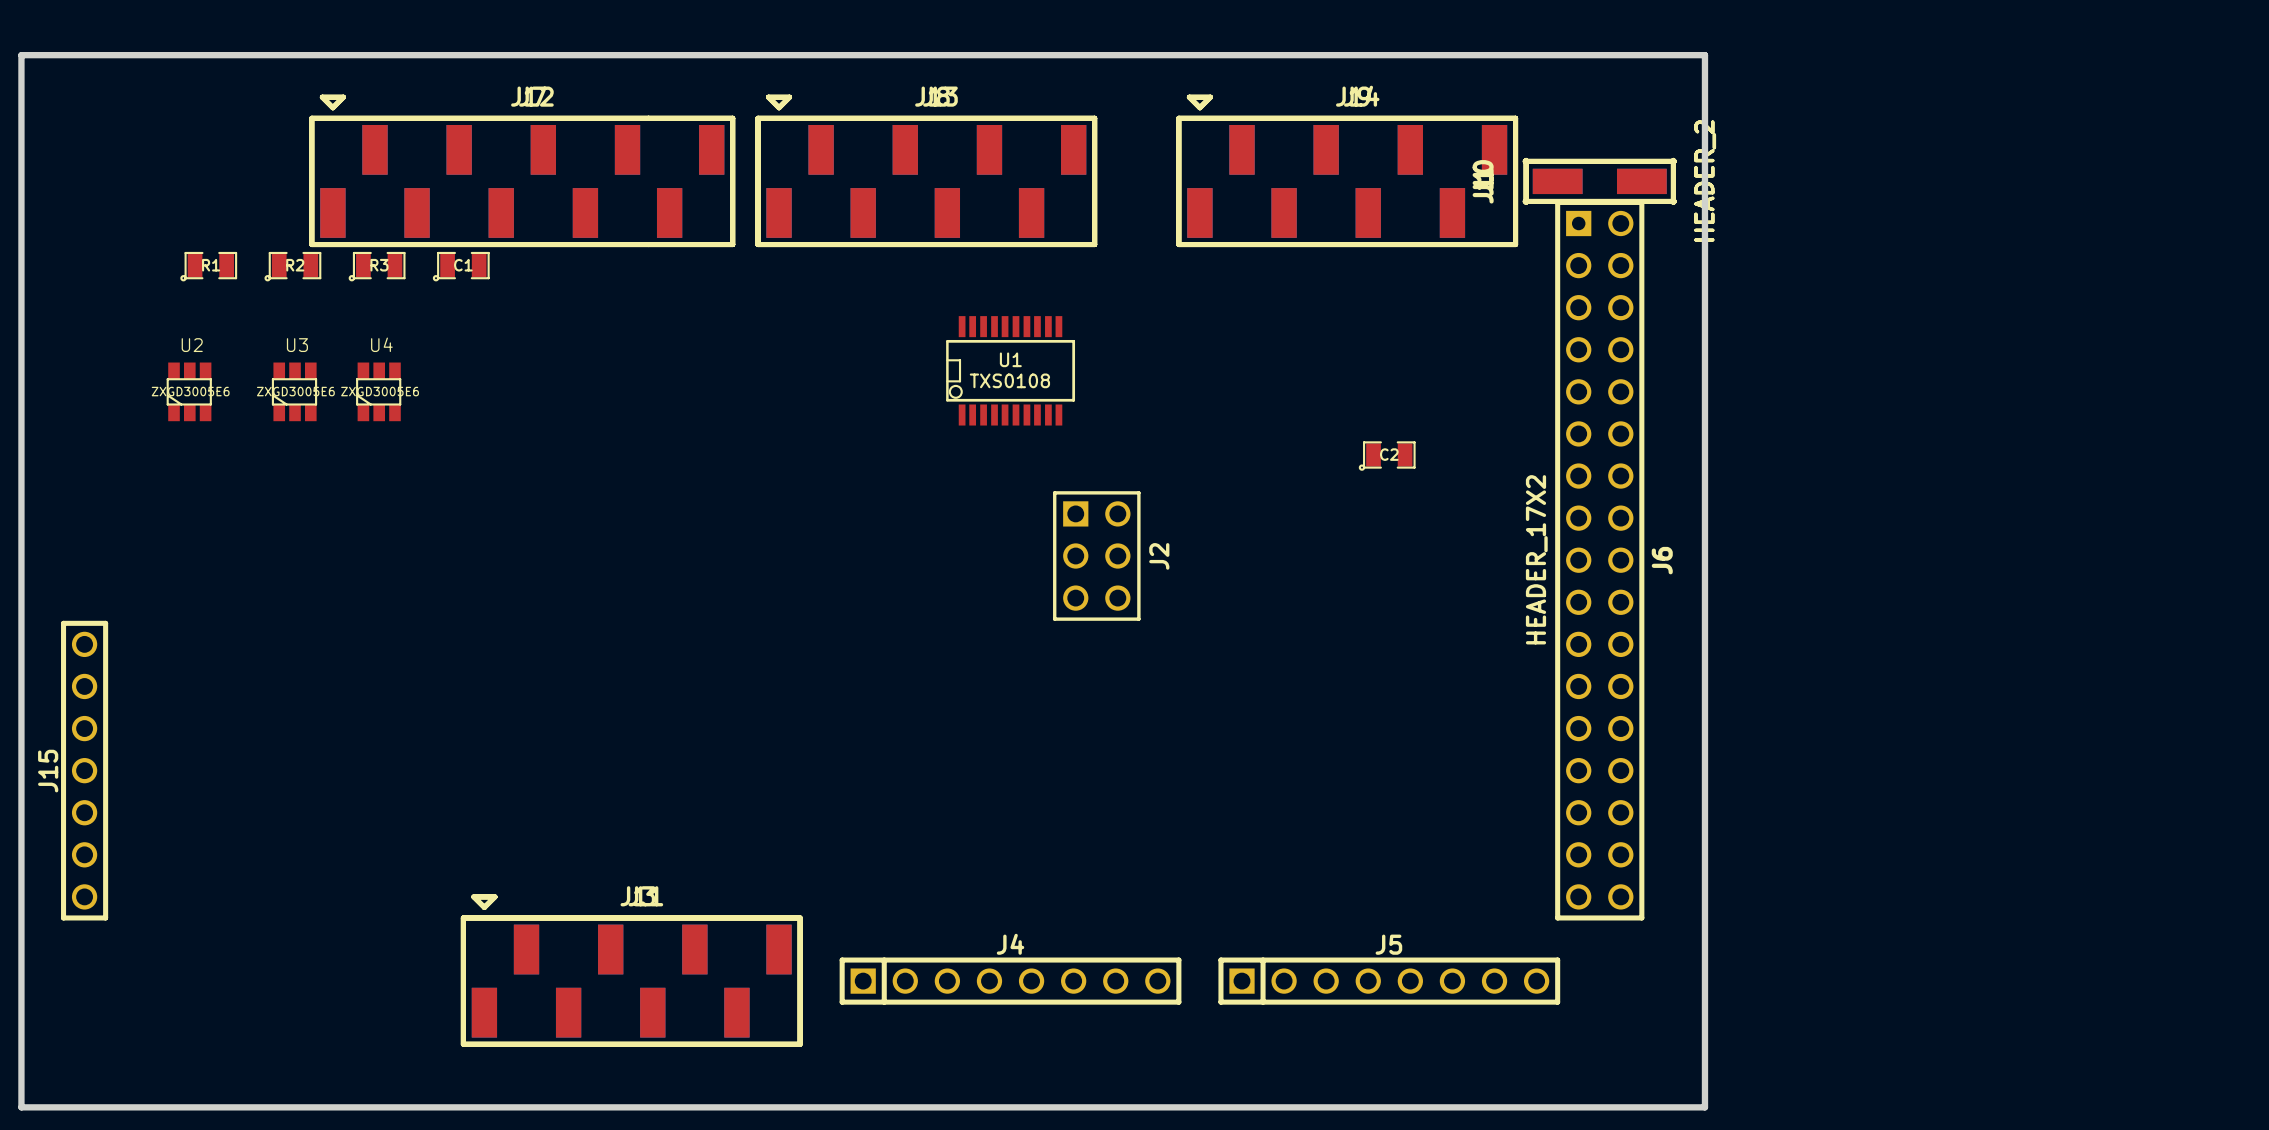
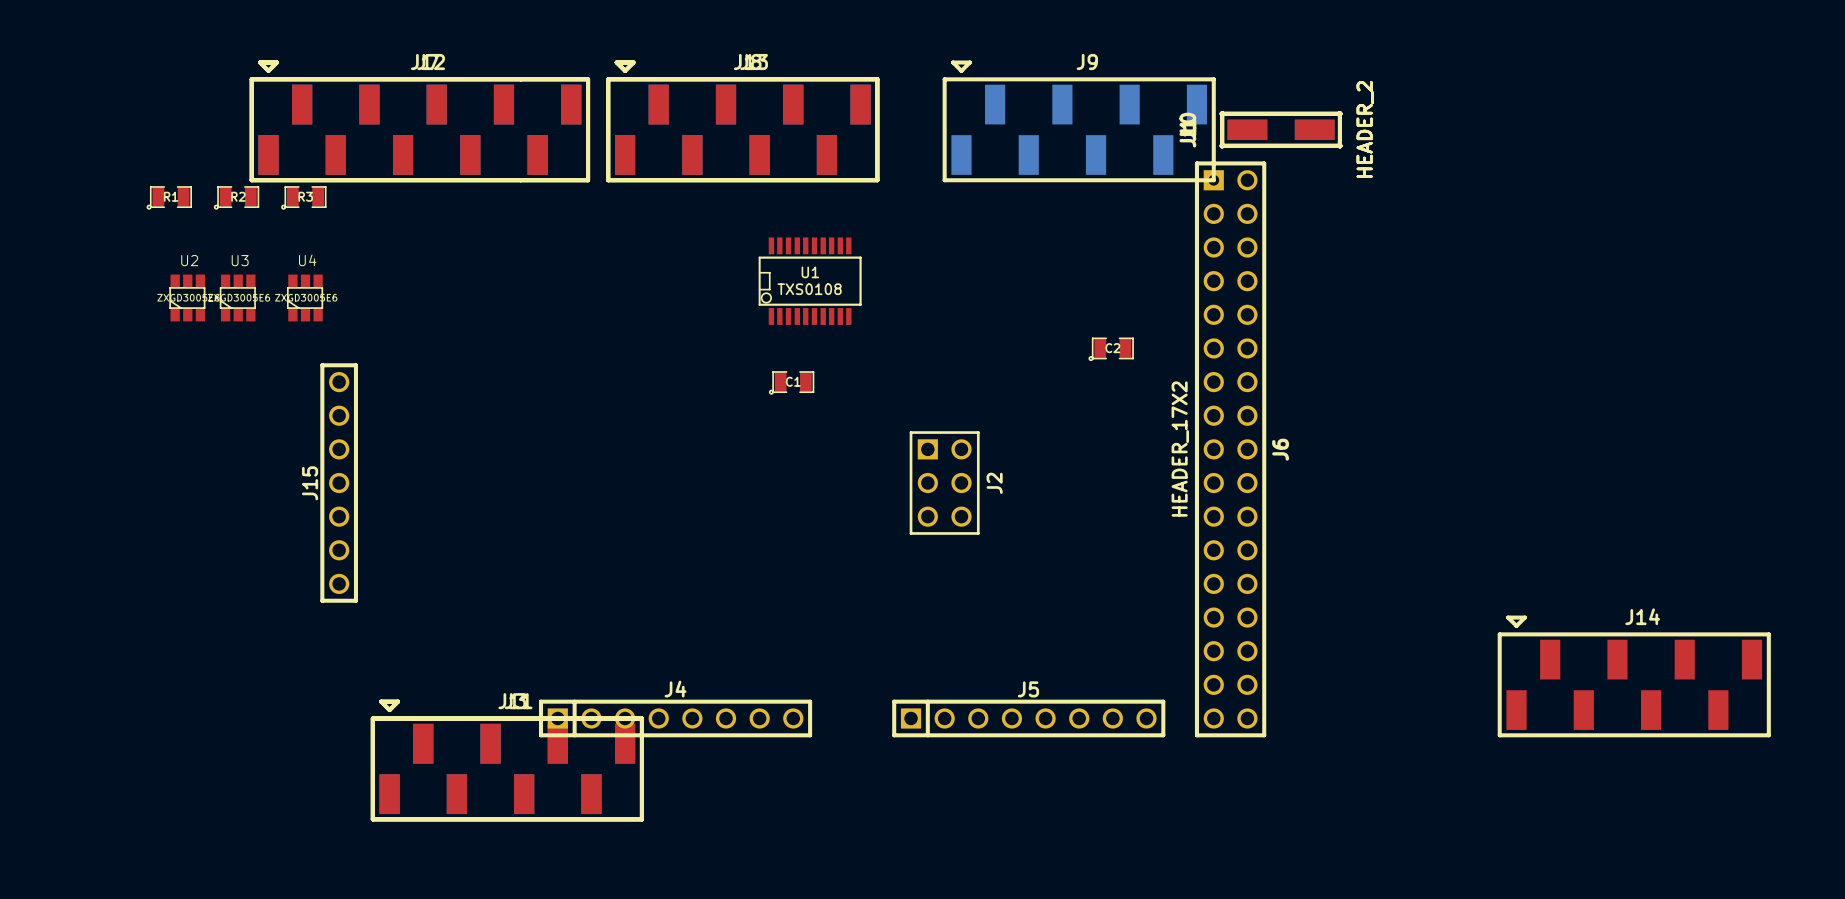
board edge: (21, 55) (1704, 55) (1704, 1107) (21, 1107) (21, 55) -> none
J14 position: (1347, 170) -> (1634, 676)
C1 position: (461, 266) -> (791, 382)
U2 position: (189, 391) -> (187, 297)
J2 position: (1096, 556) -> (944, 483)
J6 position: (1599, 560) -> (1230, 449)
J15 position: (84, 770) -> (339, 483)
J4 position: (1010, 981) -> (675, 718)
J5 position: (1389, 981) -> (1028, 718)

